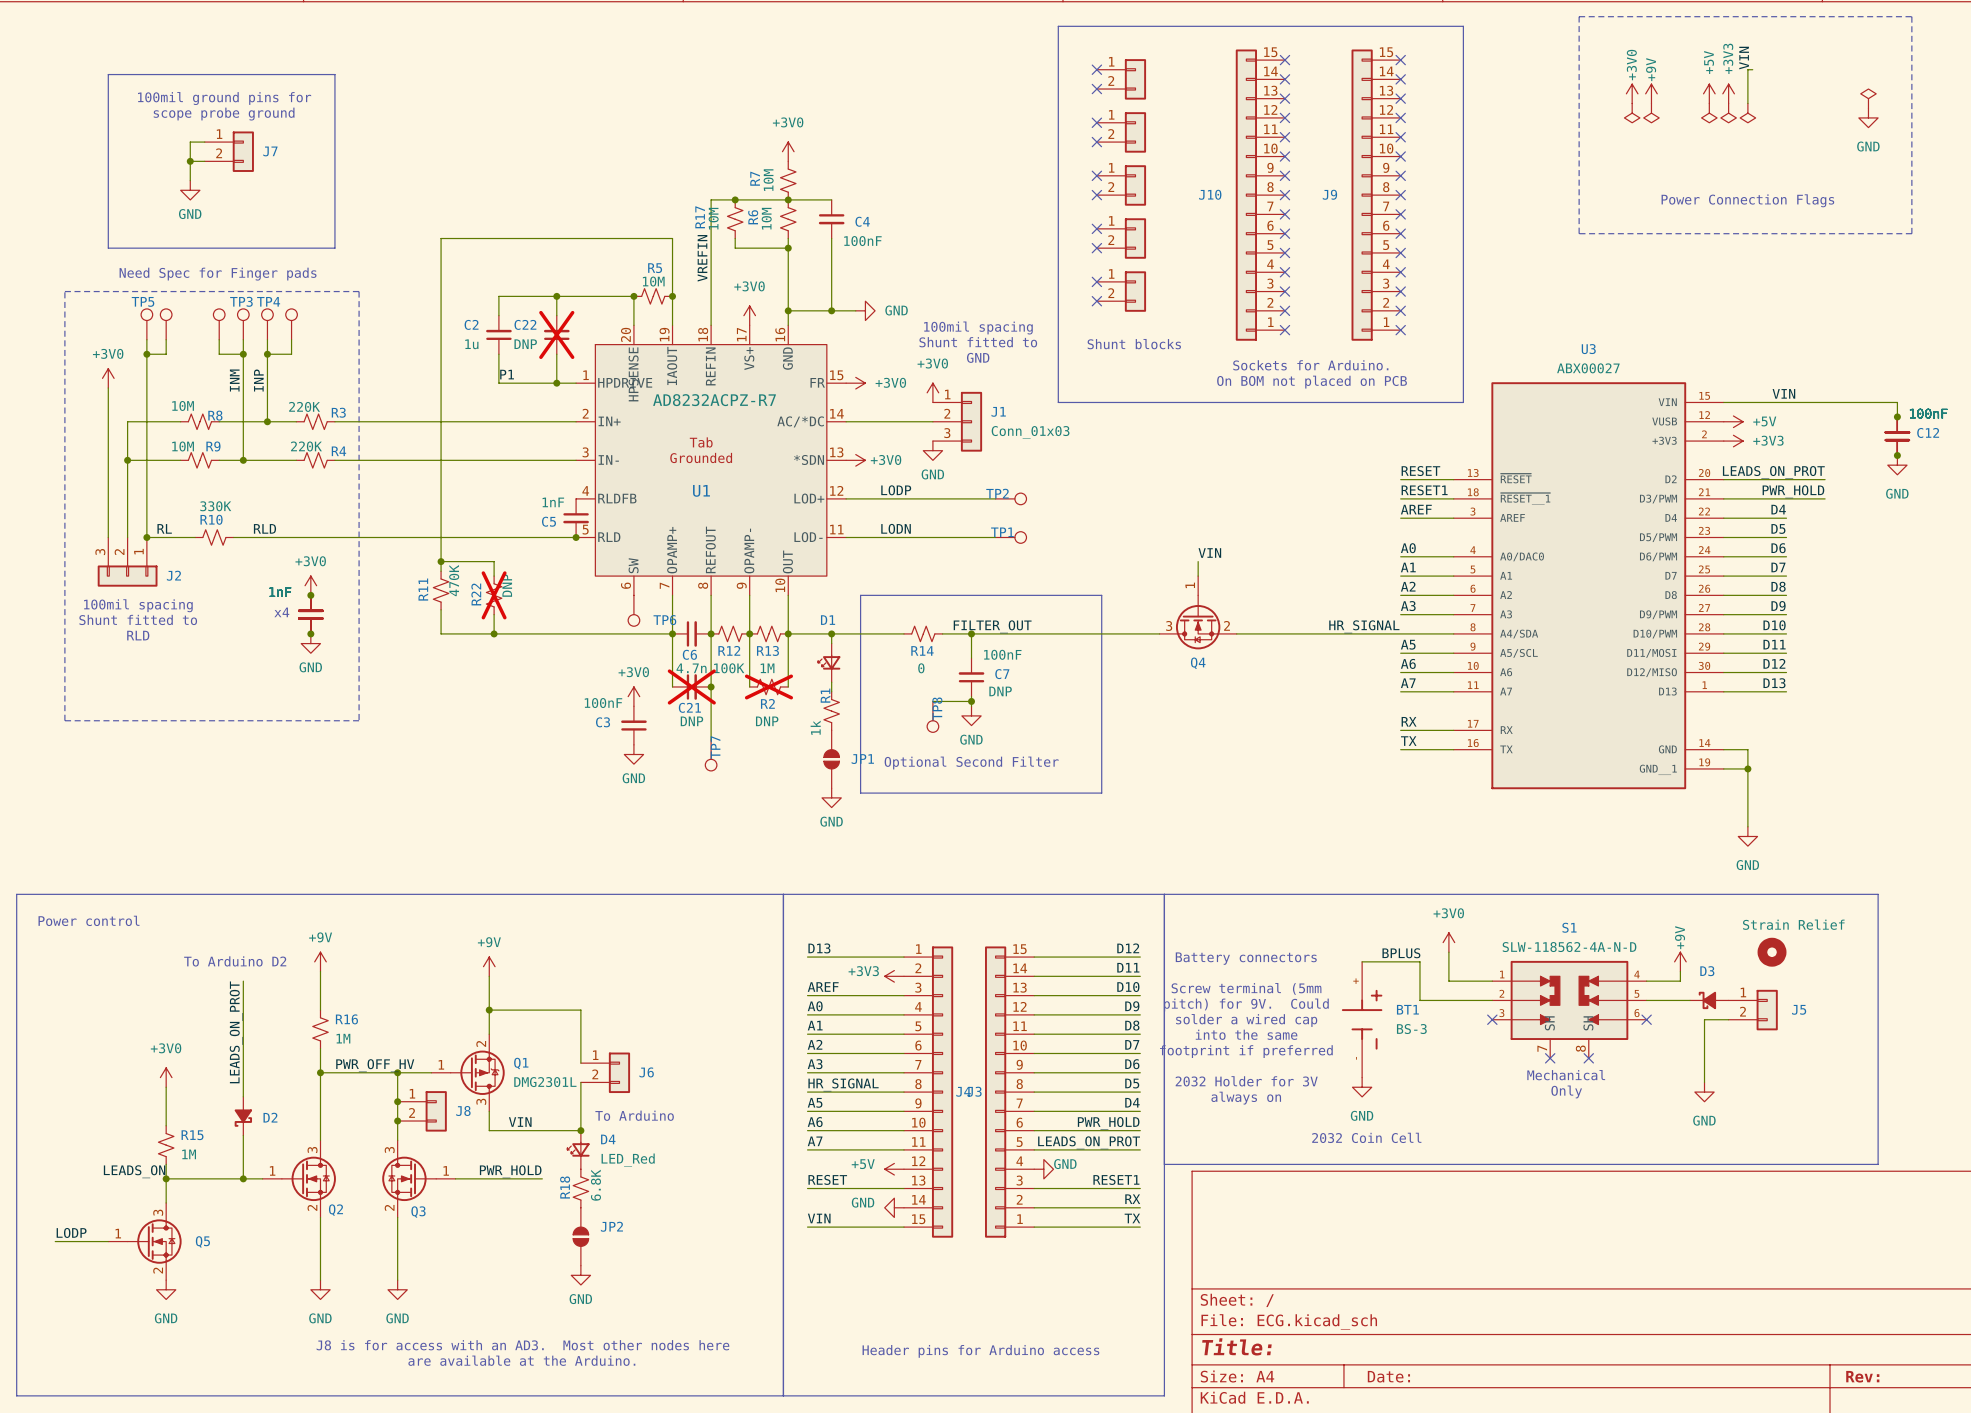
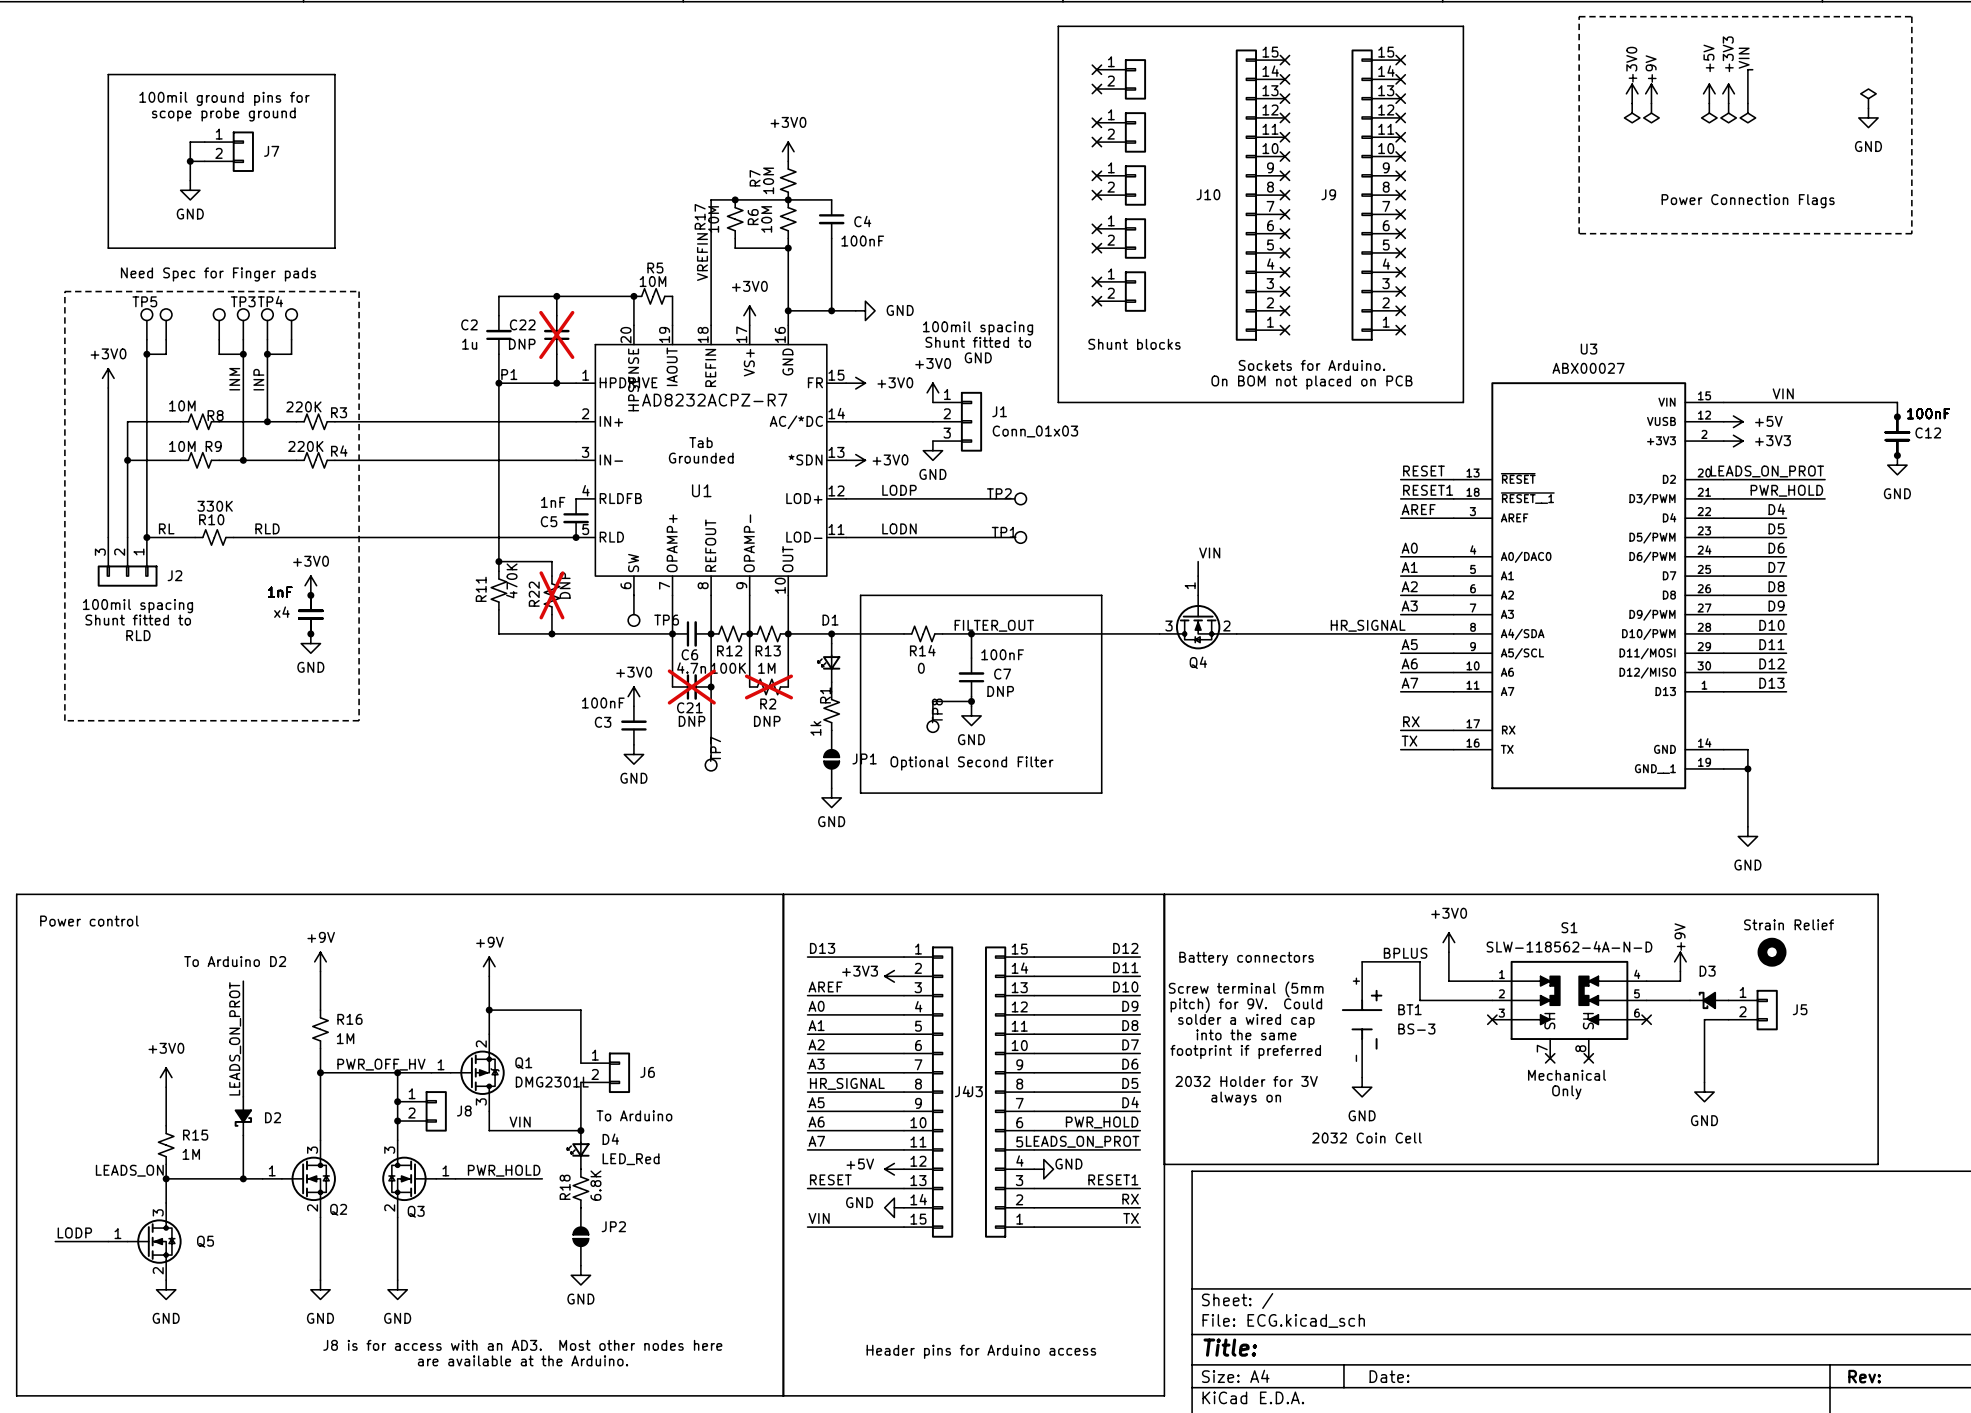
wire: (672, 296) (672, 238) (441, 238) (441, 571) -> none
junction: (672, 296) -> none
wire: none -> (498, 383) (498, 571)
junction: none -> (498, 383)
wire: (441, 561) (494, 561) (494, 576) -> (498, 561) (551, 561) (551, 576)
junction: (441, 561) -> none
junction: none -> (498, 561)
R11 position: (441, 590) -> (498, 590)
R22 position: (494, 595) -> (551, 595)
wire: (441, 609) (441, 633) (498, 633) -> (498, 609) (498, 633)
wire: (494, 614) (494, 633) -> (551, 614) (551, 633)
junction: (494, 633) -> none
junction: none -> (551, 633)

